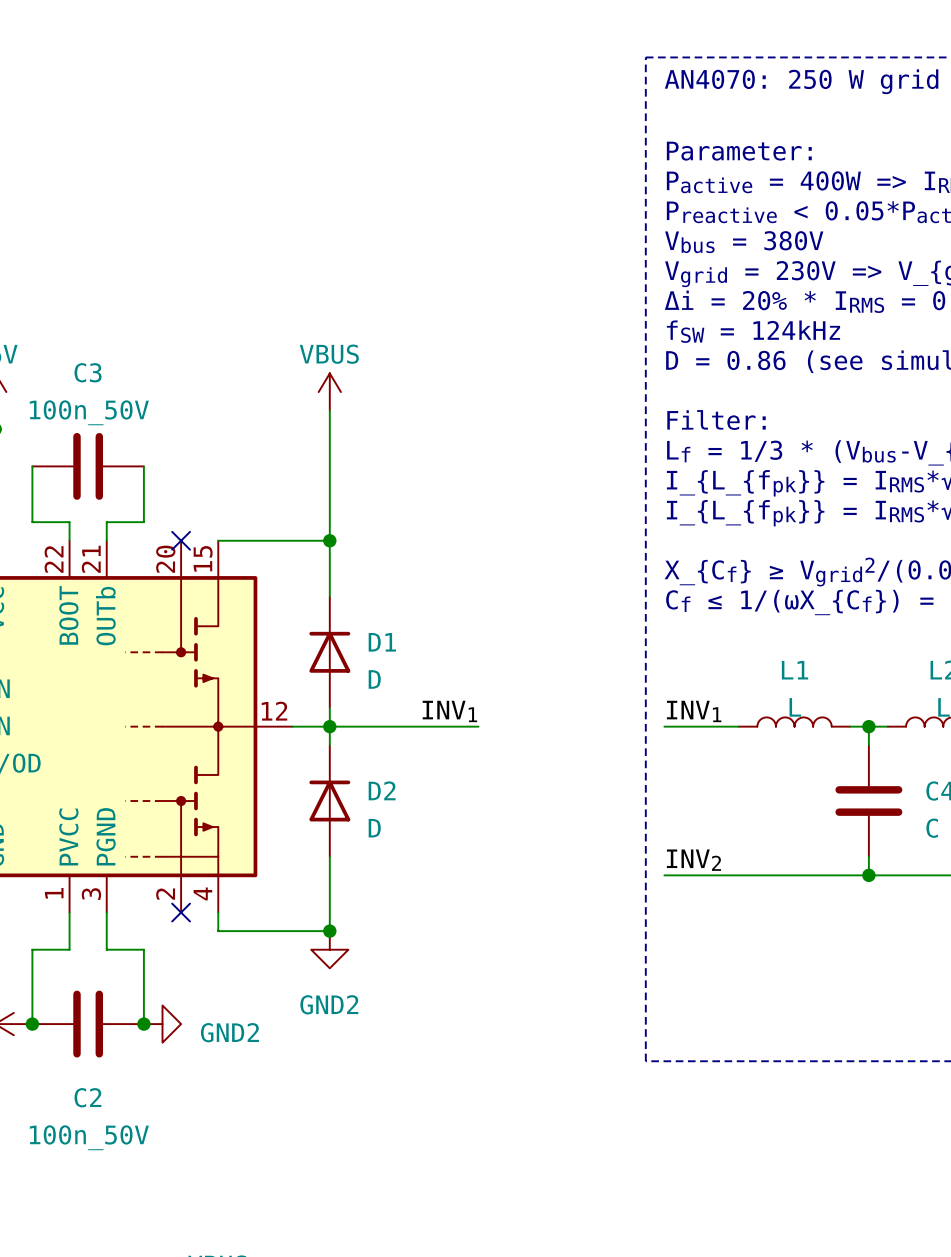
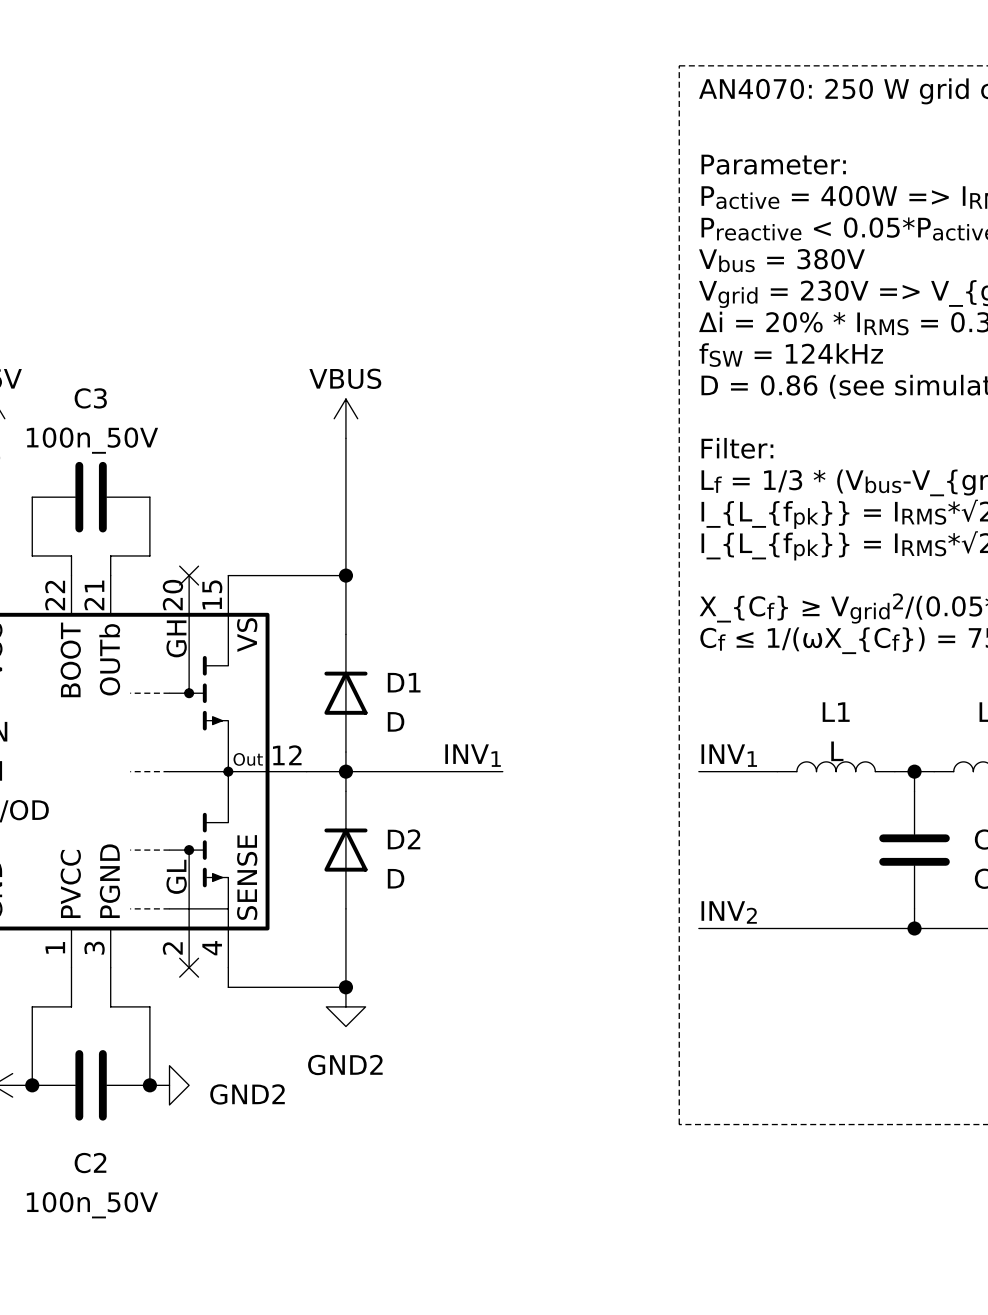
part text: none -> VS (247, 635)
part text: none -> GH (176, 638)
part text: none -> Out (248, 759)
part text: none -> GL (176, 876)
part text: none -> SENSE (247, 877)

